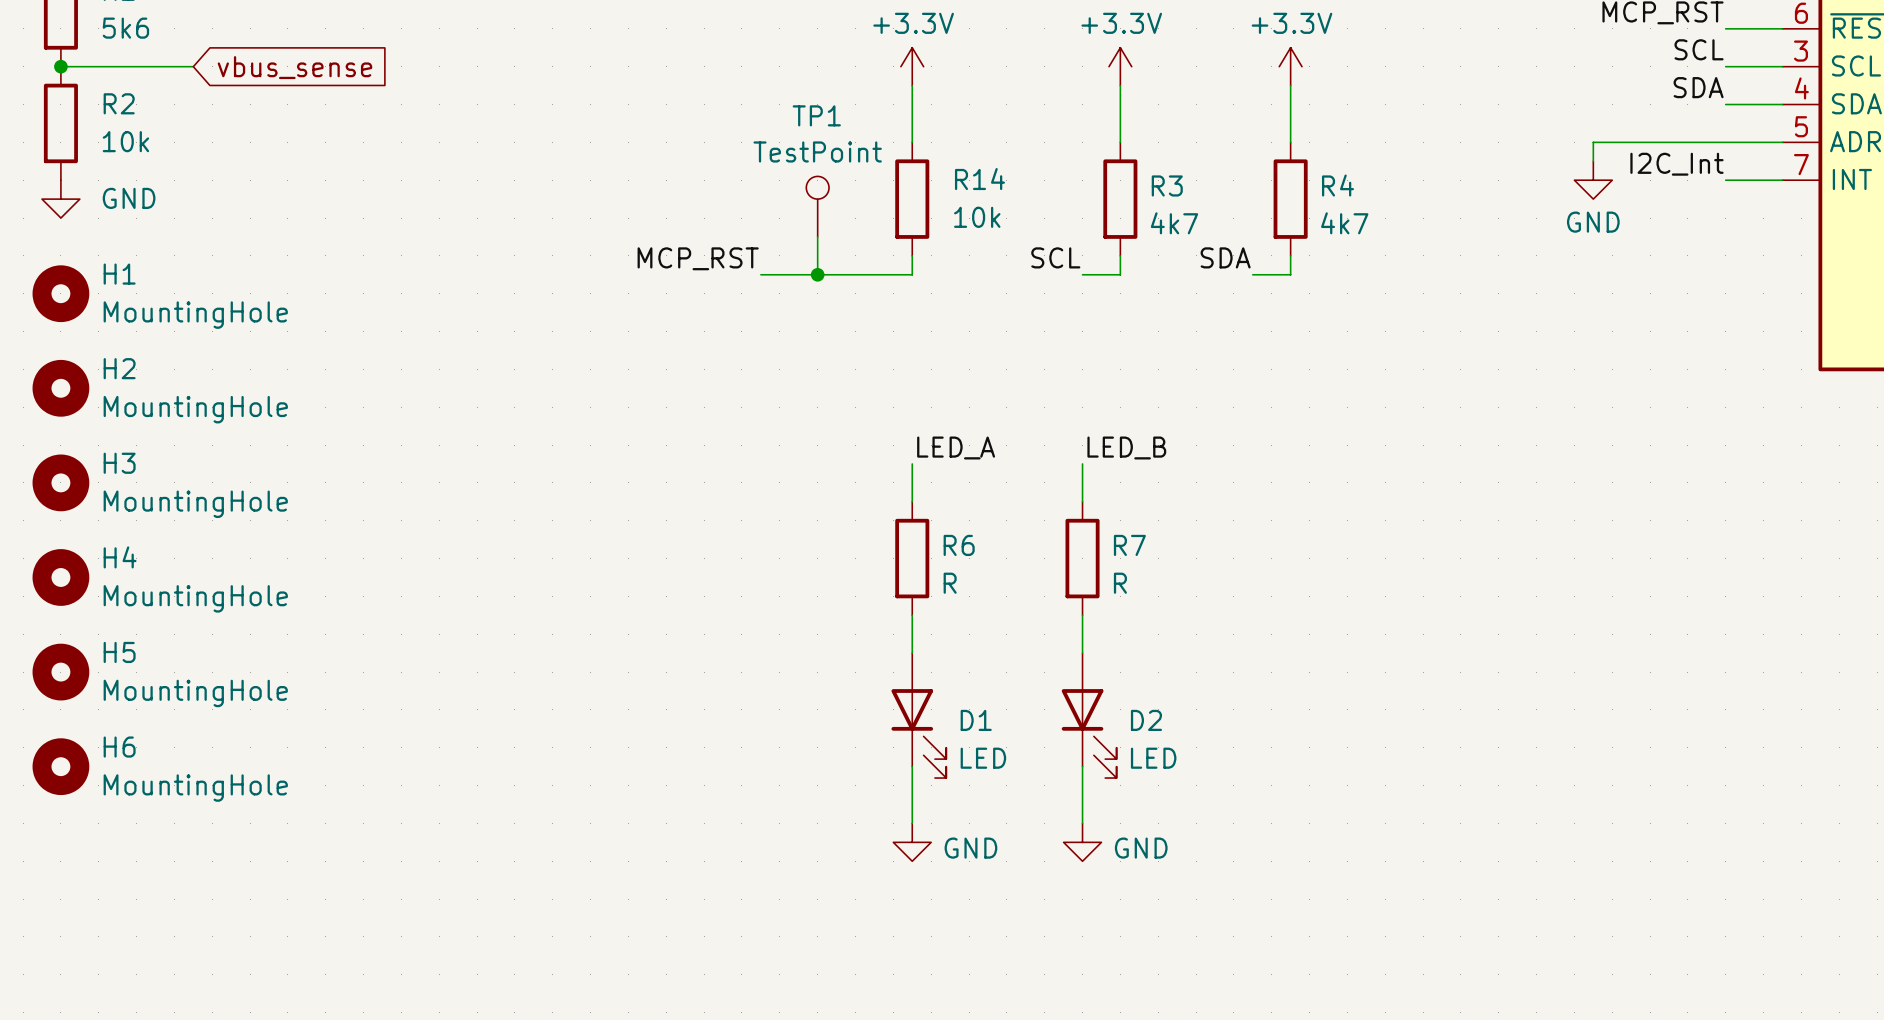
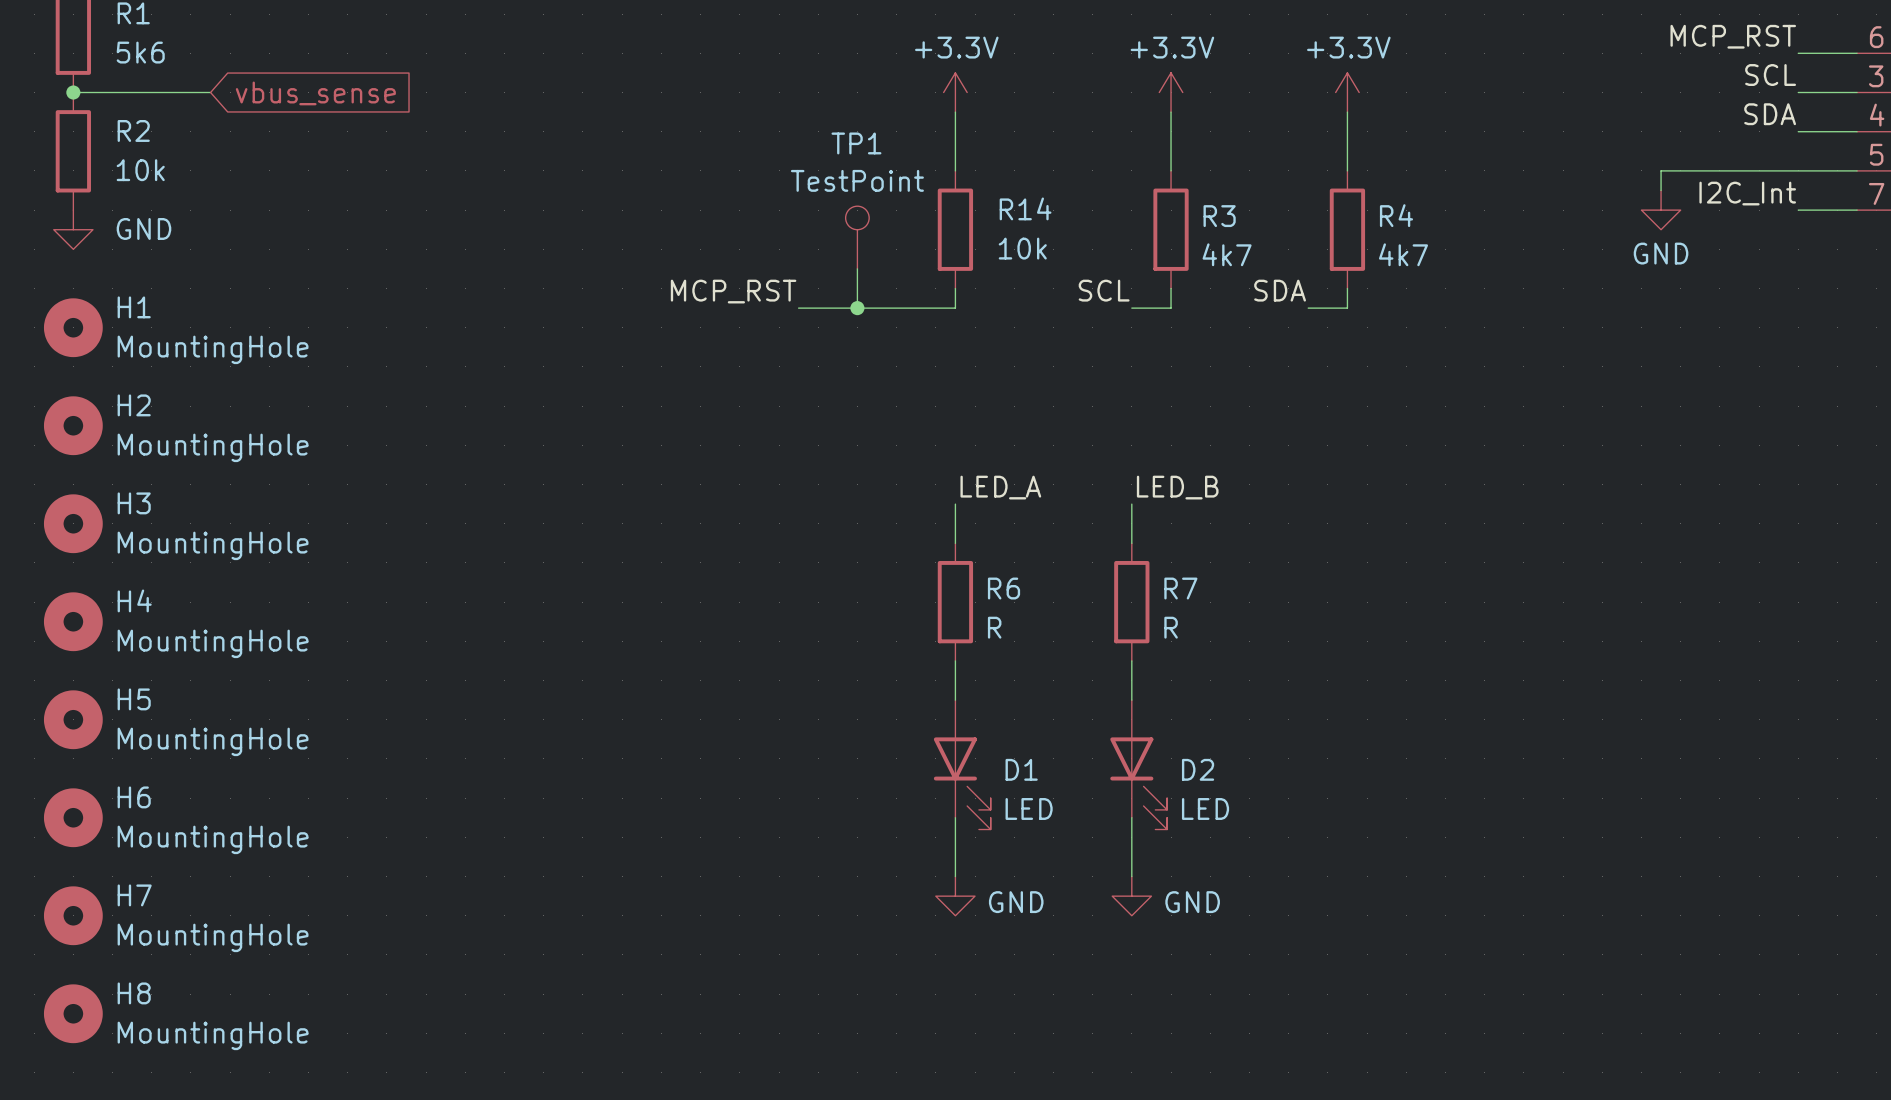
H7: none -> MountingHole (73, 915)
H8: none -> MountingHole (73, 1013)

